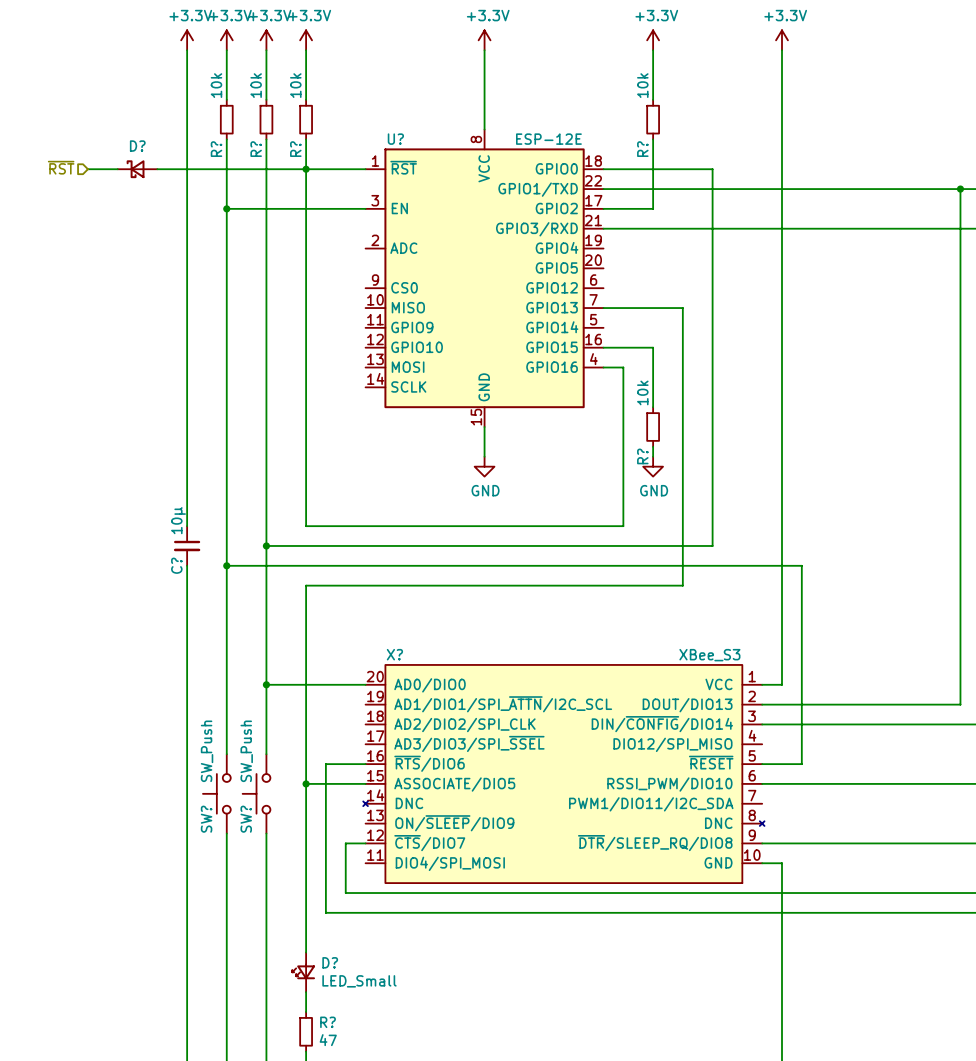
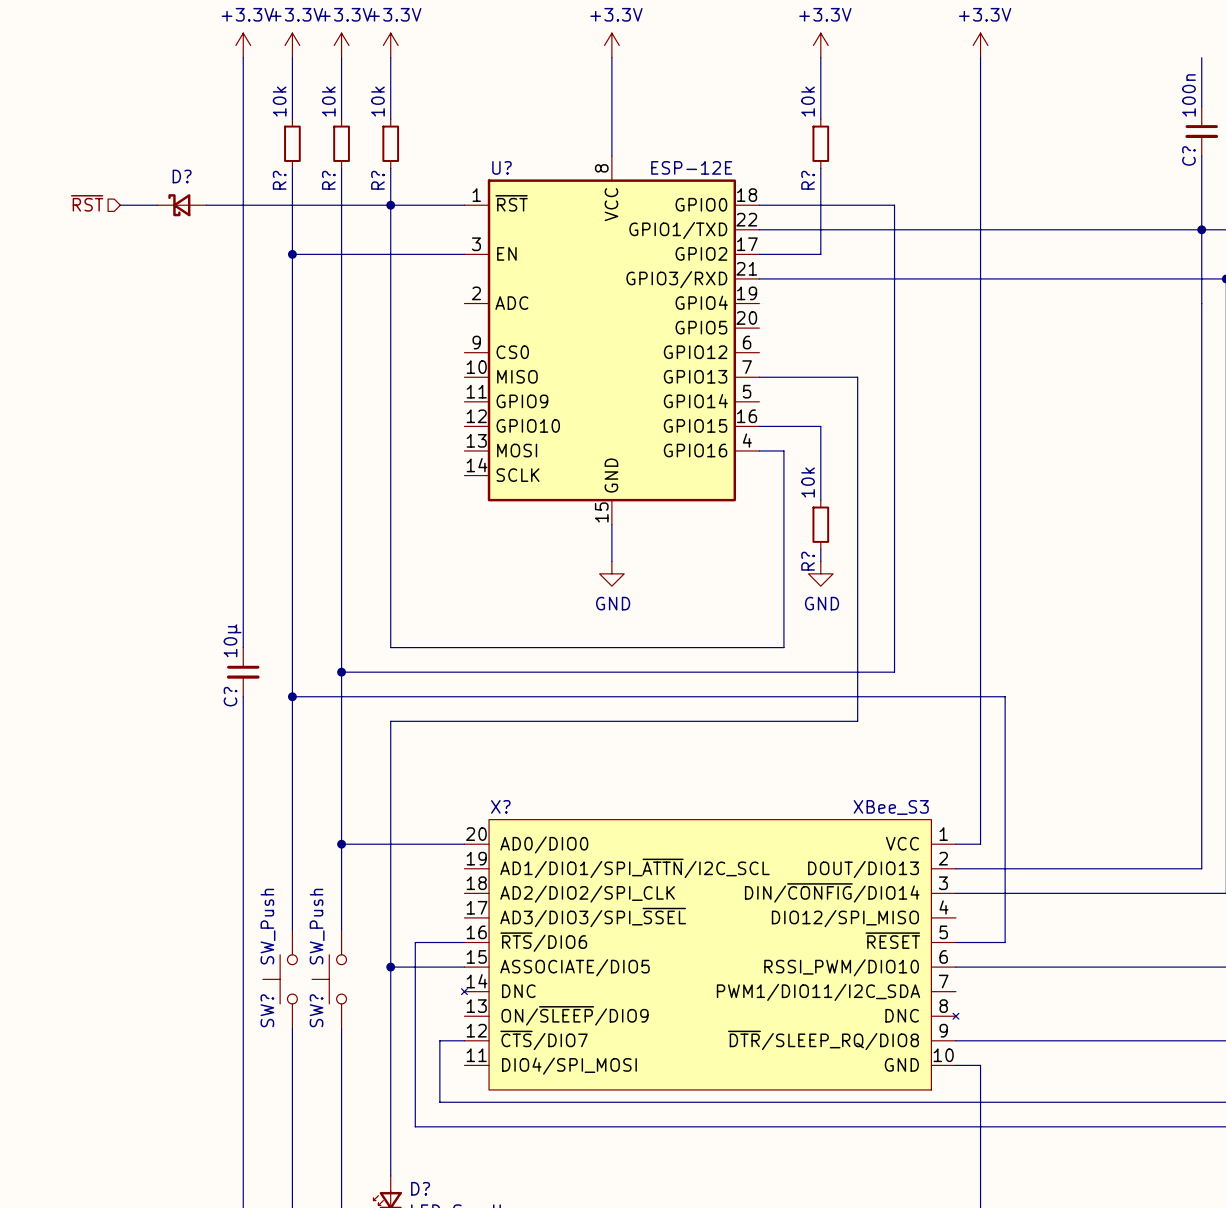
wire: none -> (1201, 57) (1201, 106)
C?: none -> 100n (1201, 131)
wire: none -> (1201, 156) (1201, 229)

